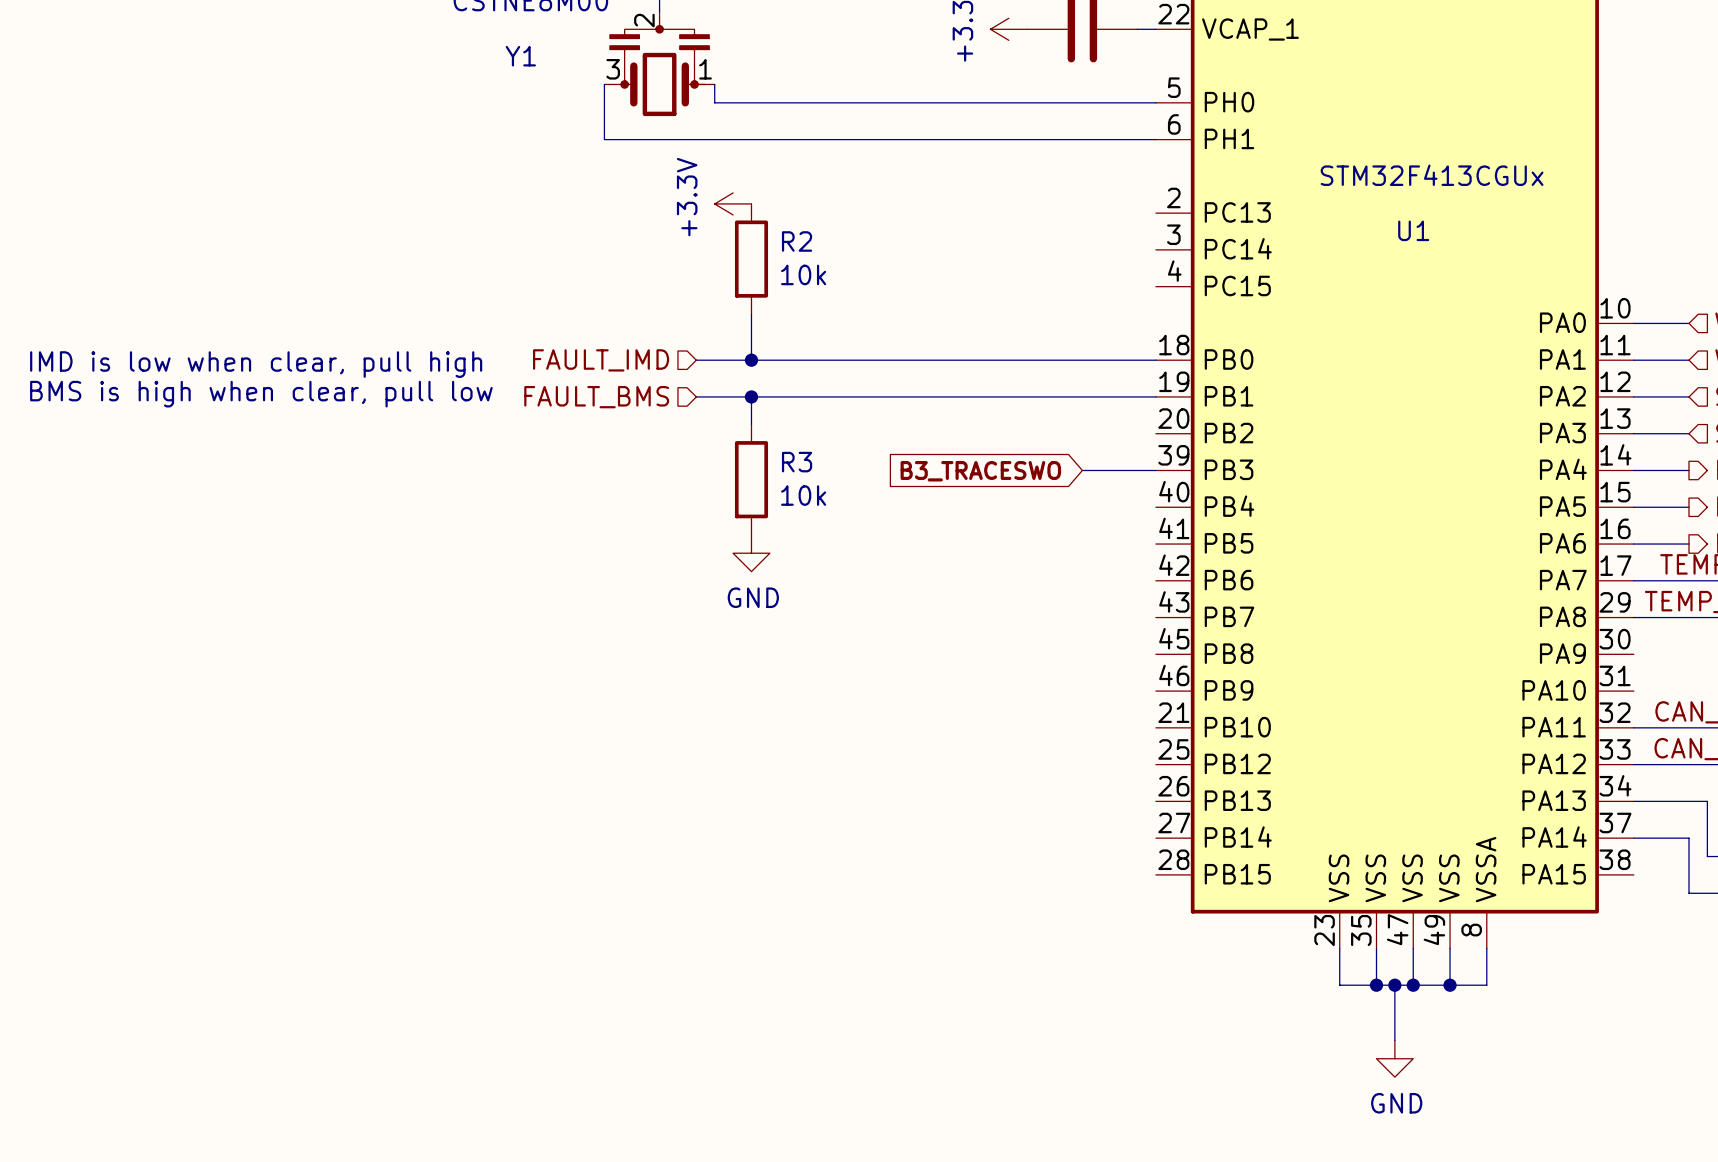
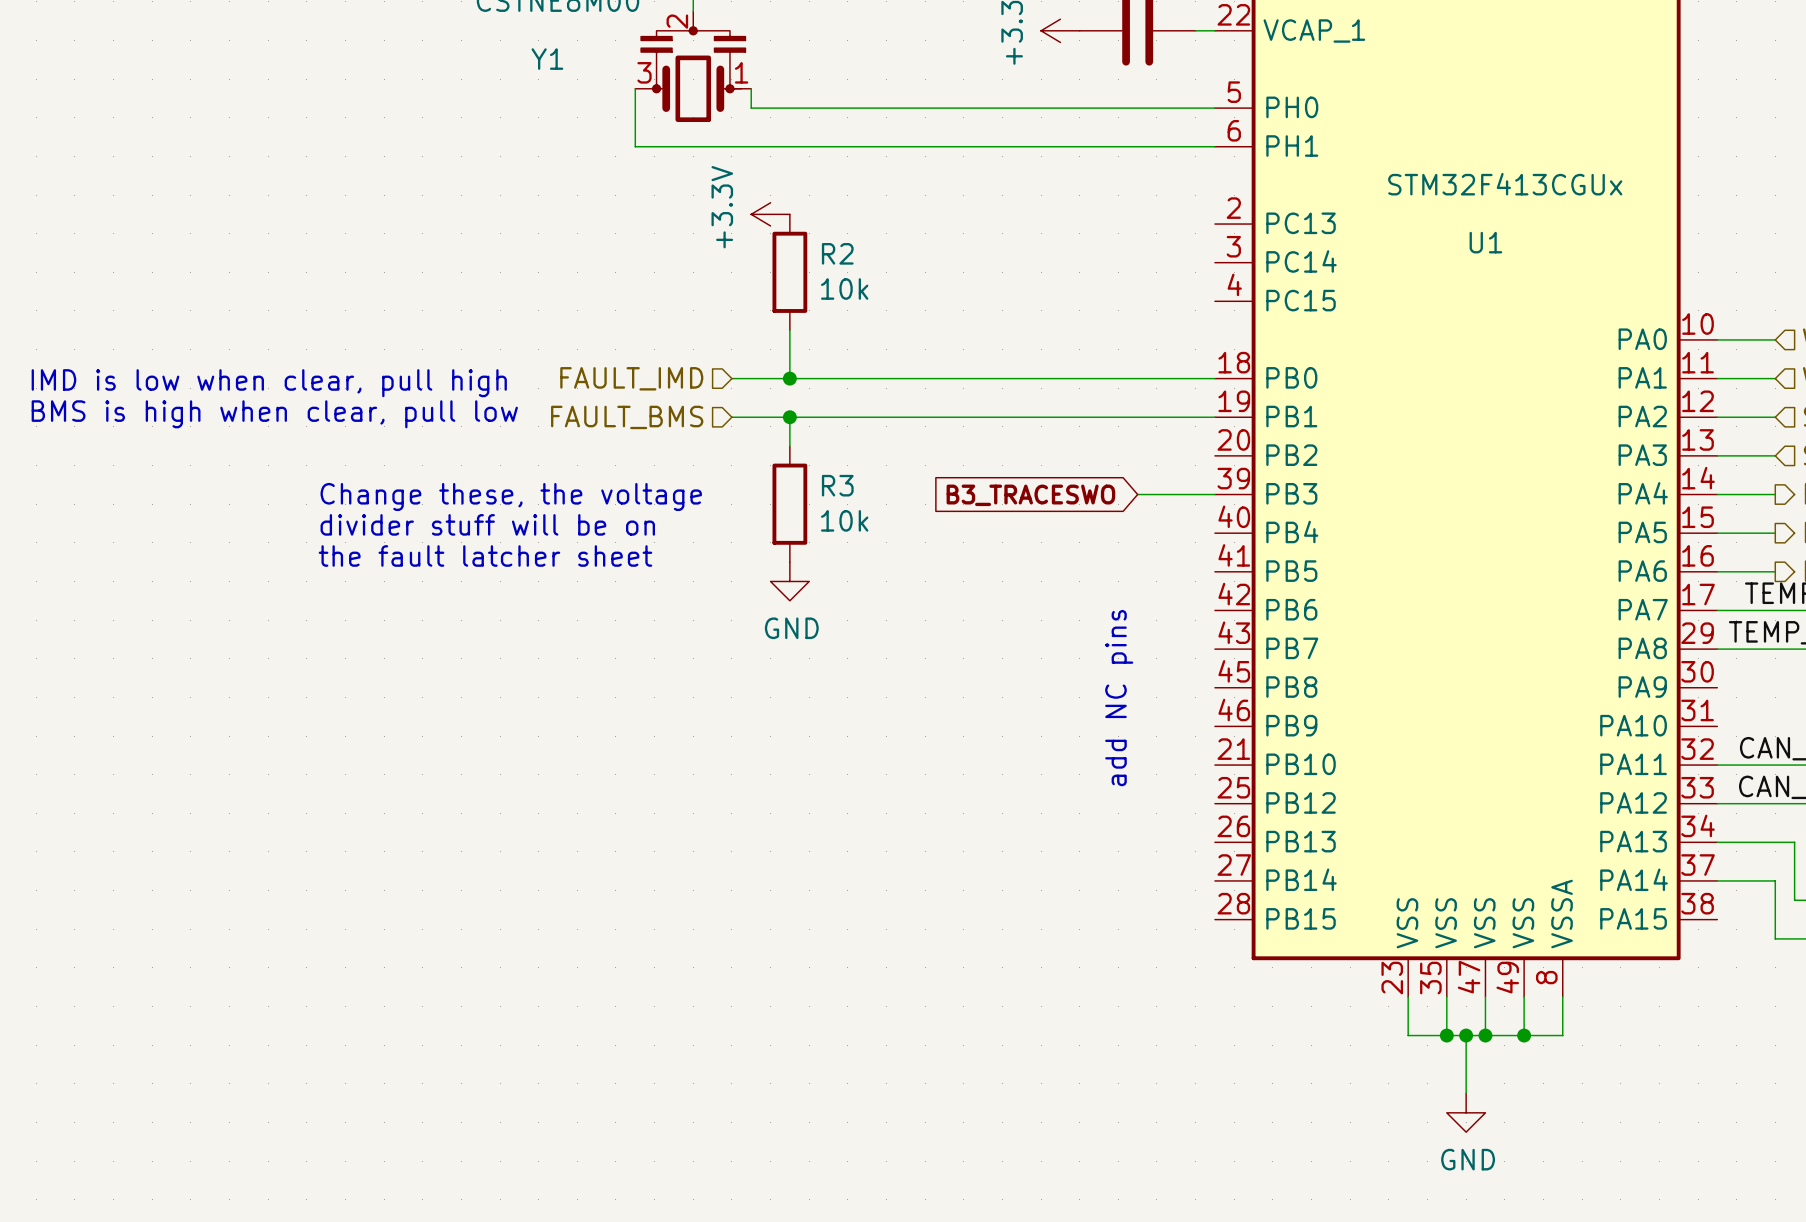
text: none -> Change these, the voltage (511, 496)
text: none -> divider stuff will be on (487, 524)
text: none -> the fault latcher sheet (485, 555)
text: none -> add NC pins (1119, 698)

